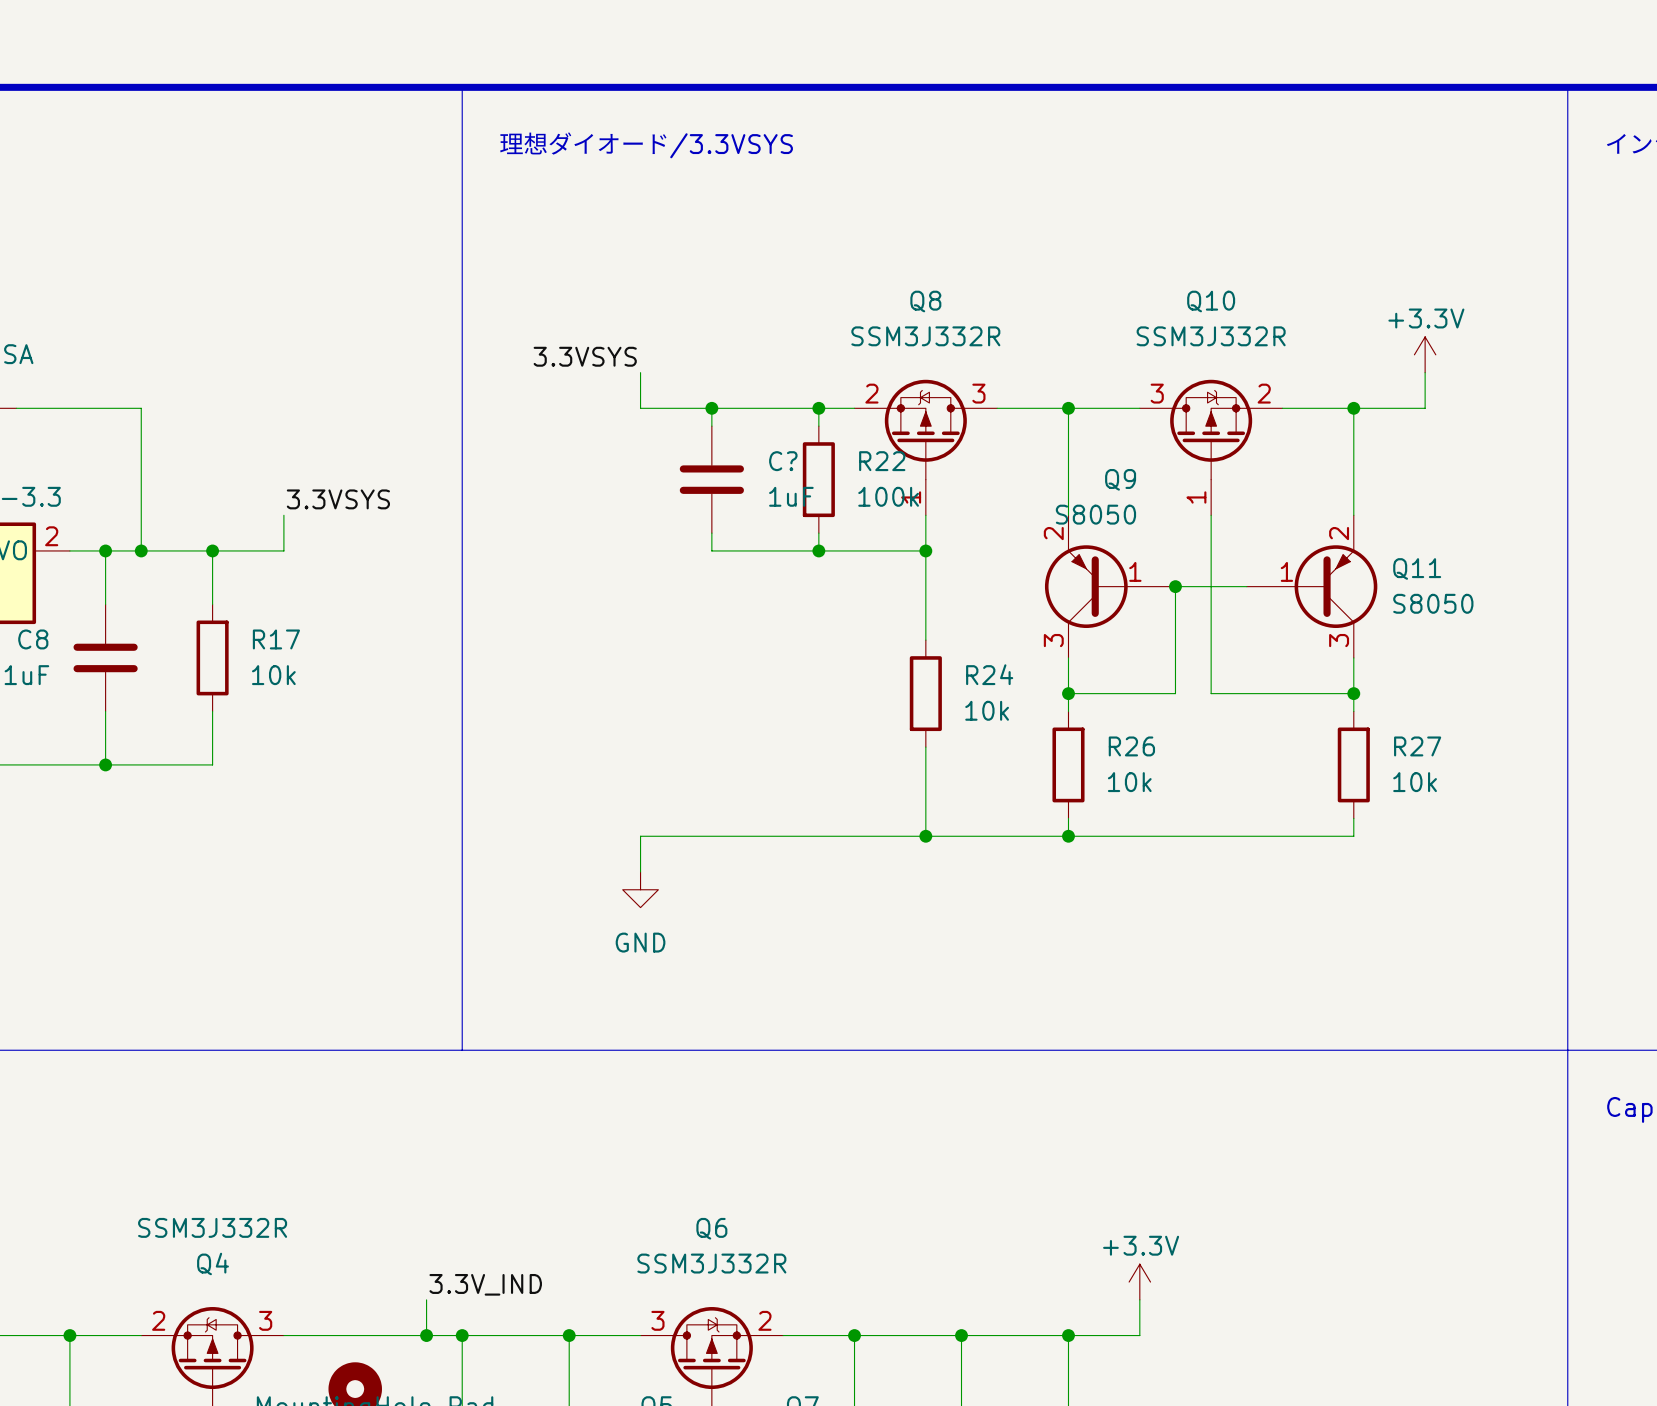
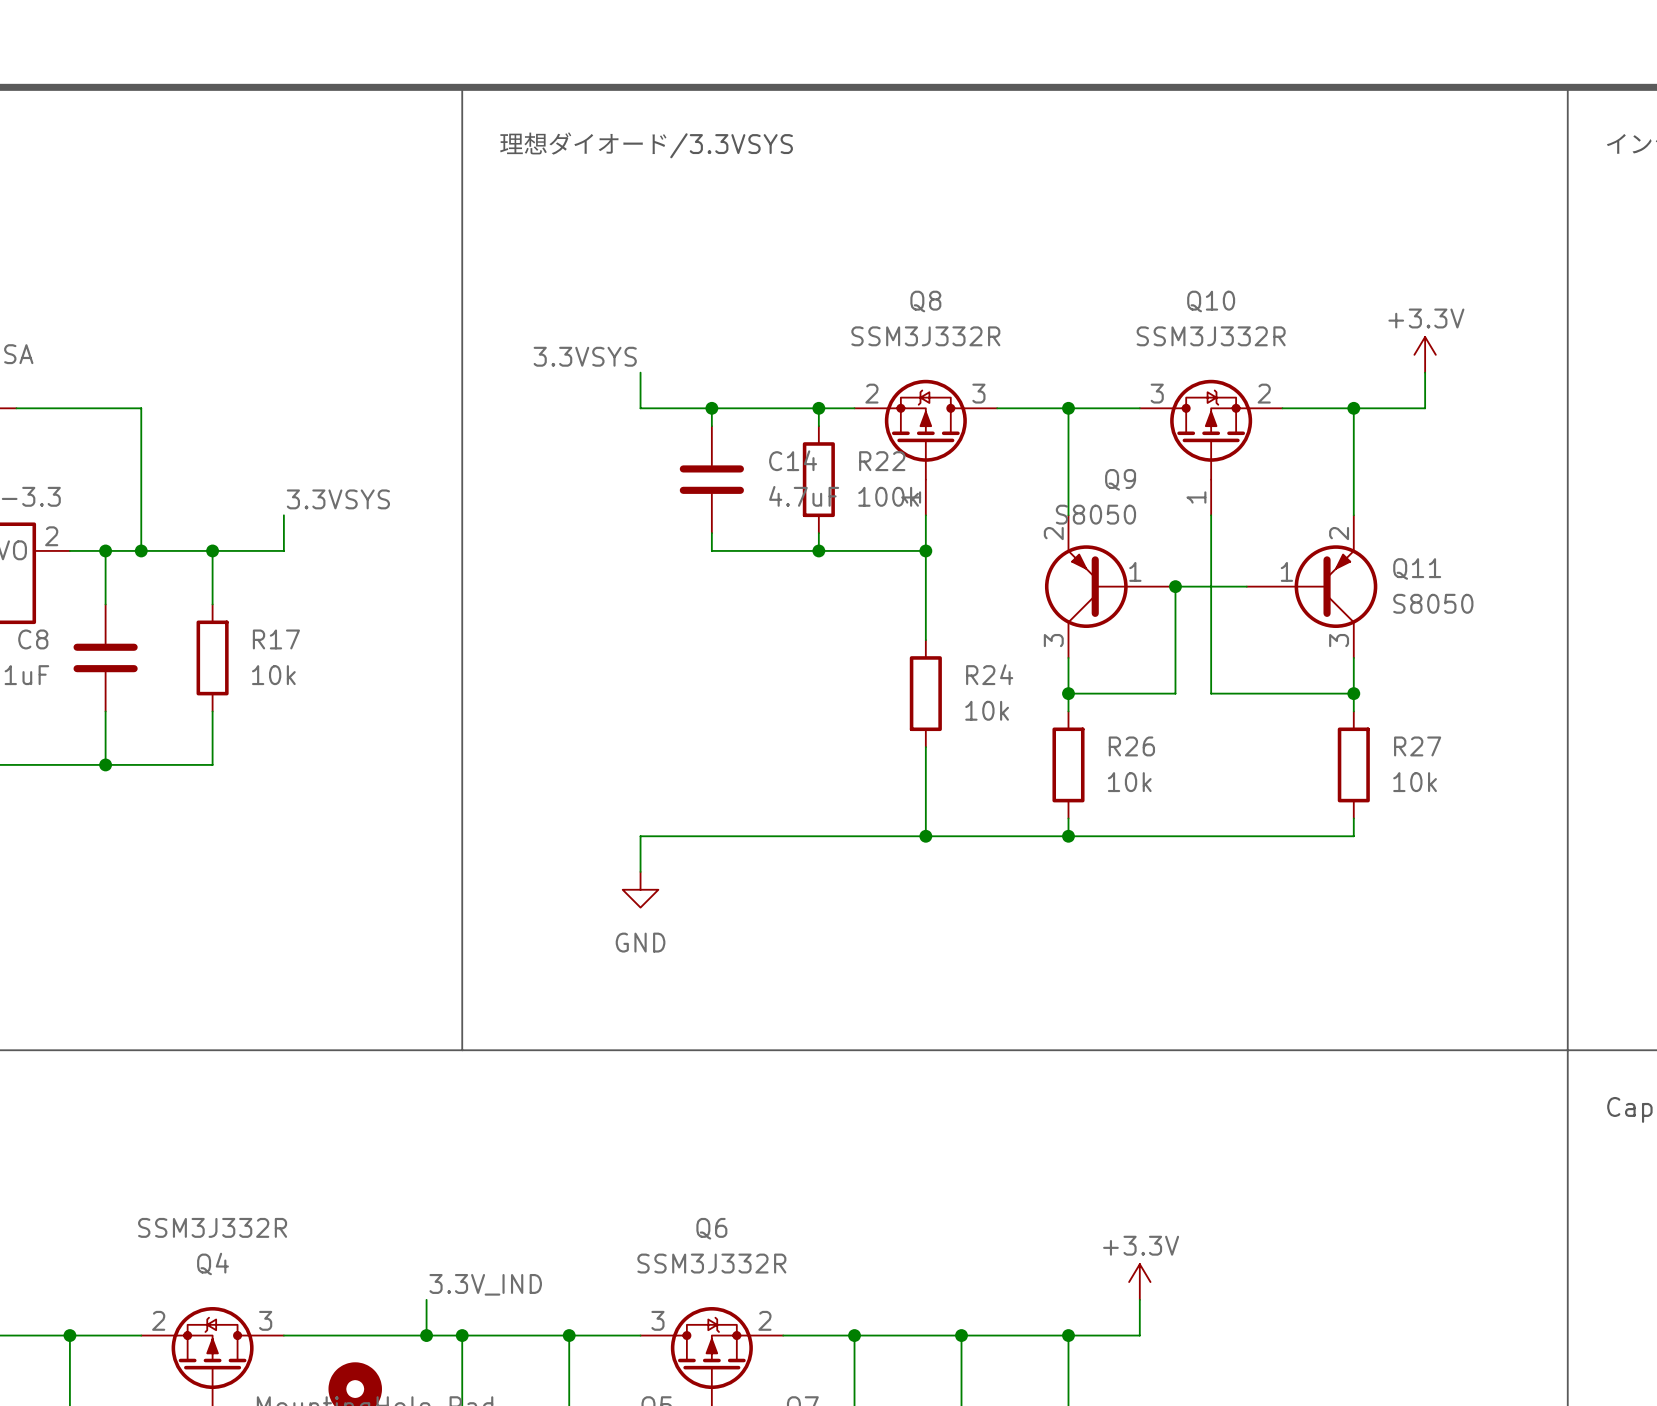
C? name: C? (783, 461) -> C14 (793, 460)
C? value: 1uF (791, 496) -> 4.7uF (804, 496)

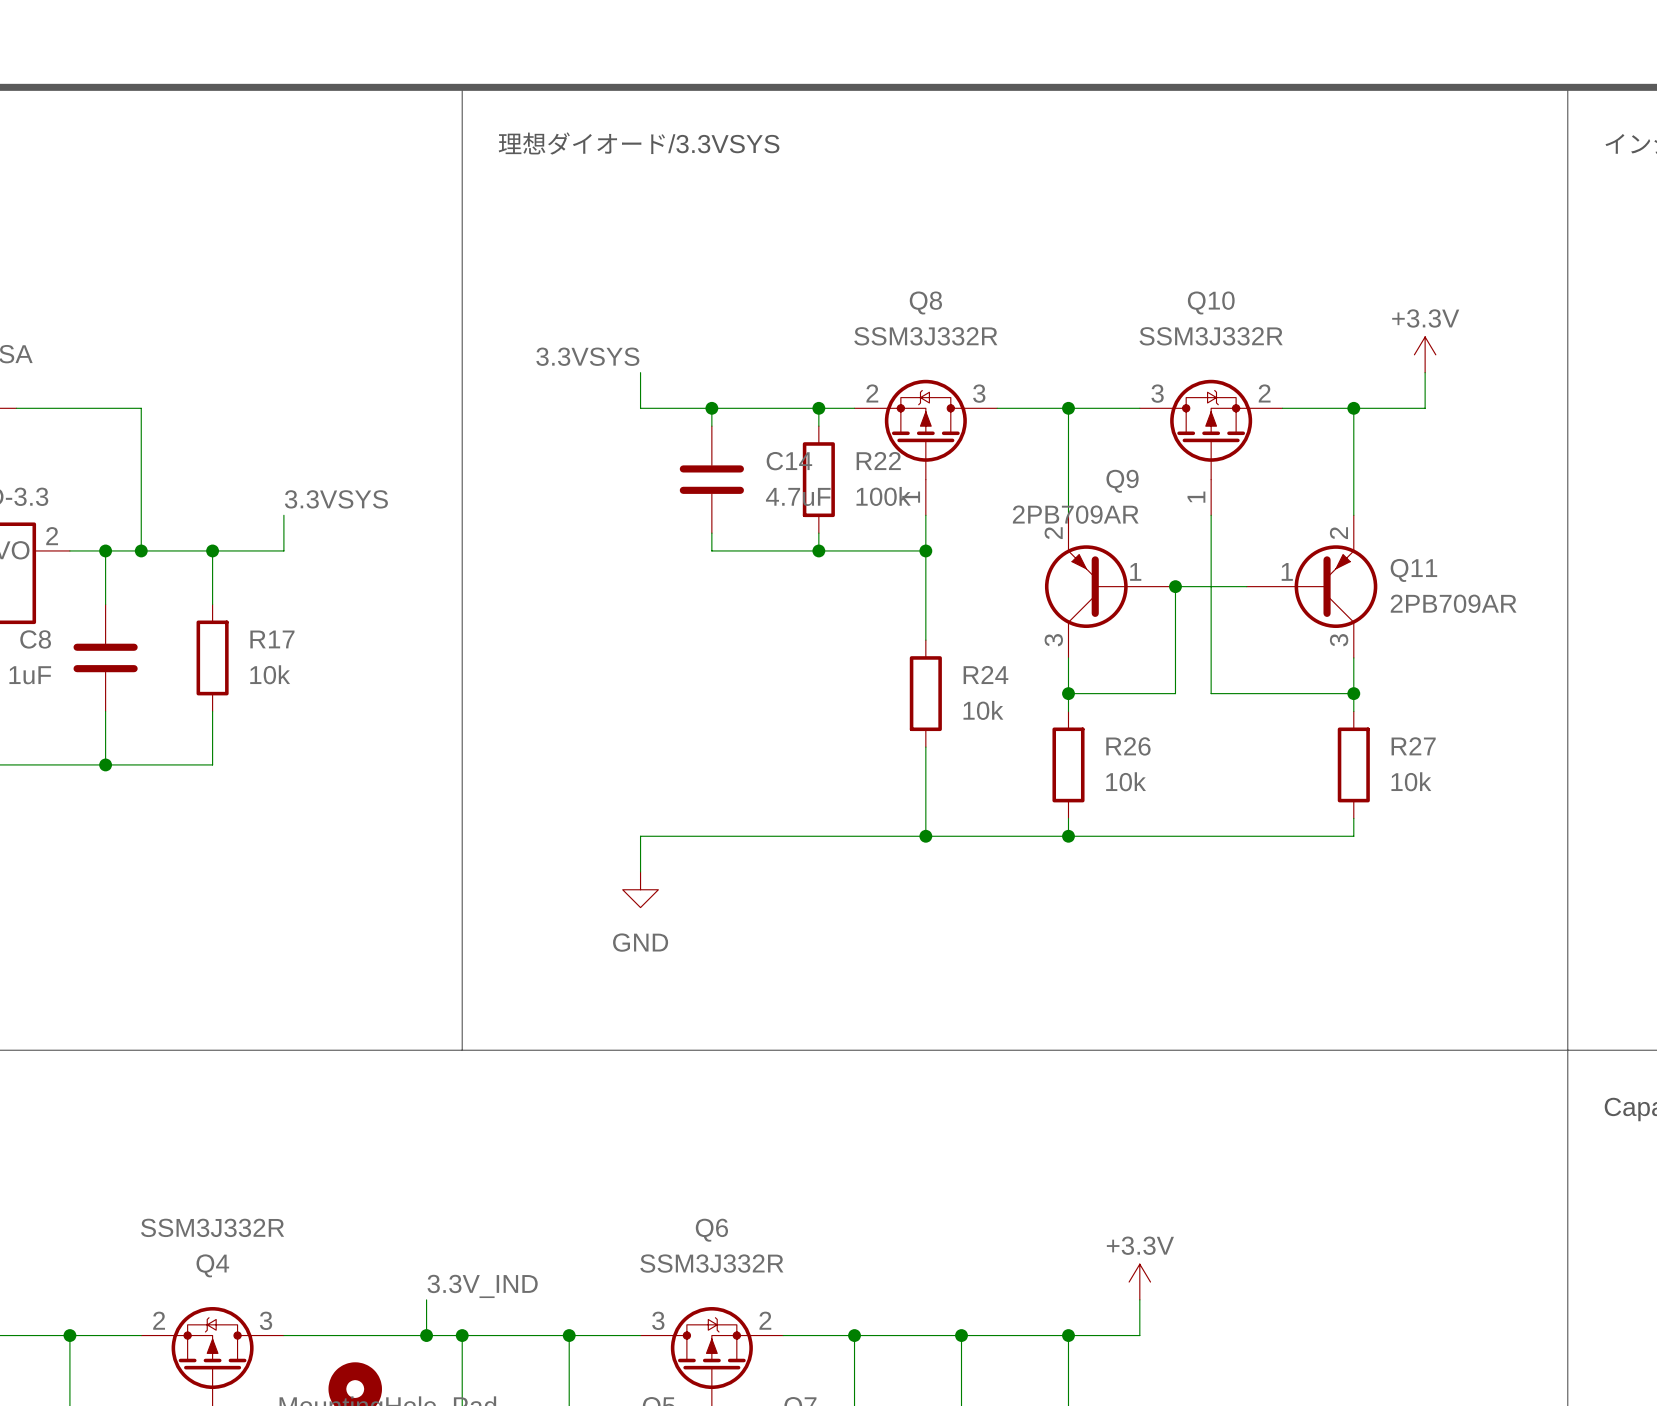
Q9 value: S8050 (1095, 514) -> 2PB709AR (1075, 514)
Q11 value: S8050 (1433, 603) -> 2PB709AR (1453, 603)

